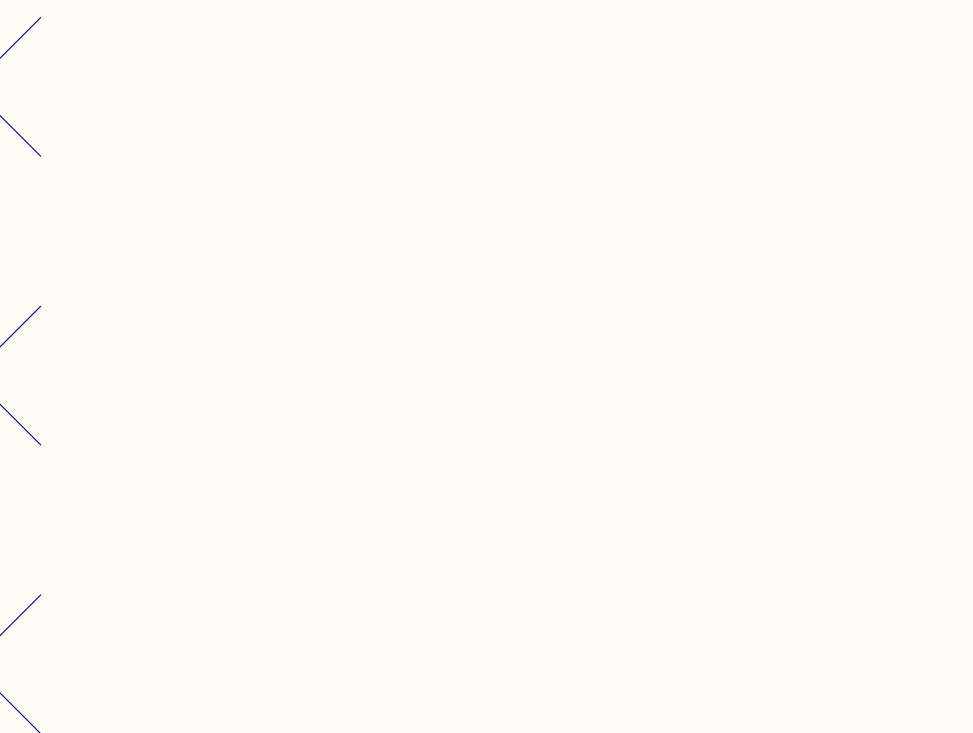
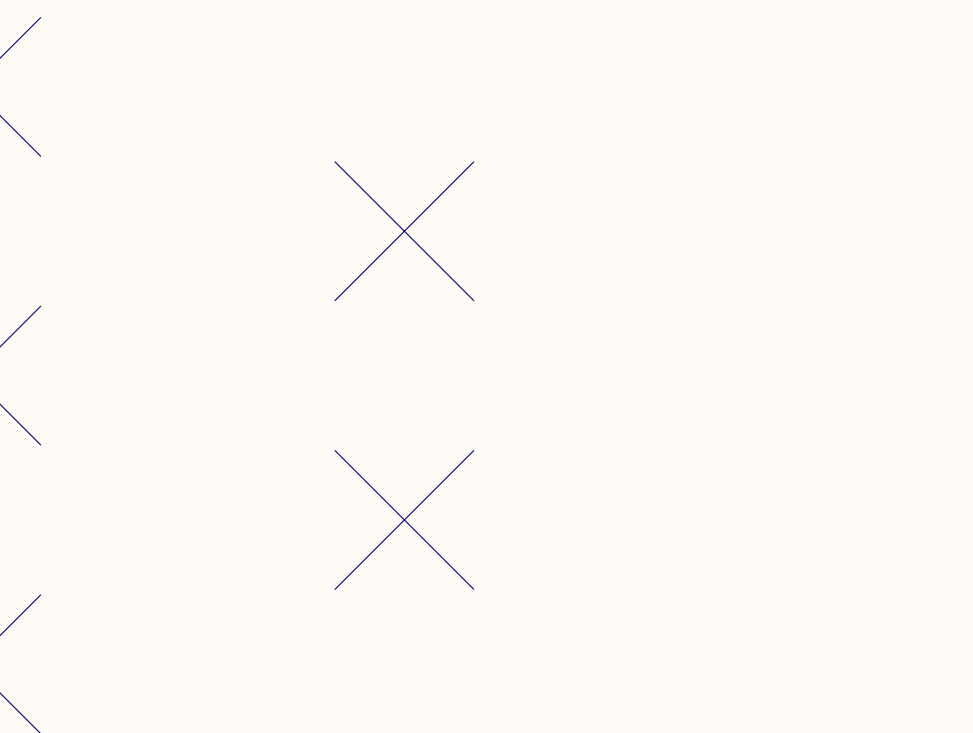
no-connect mark: none -> (404, 231)
no-connect mark: none -> (404, 519)

